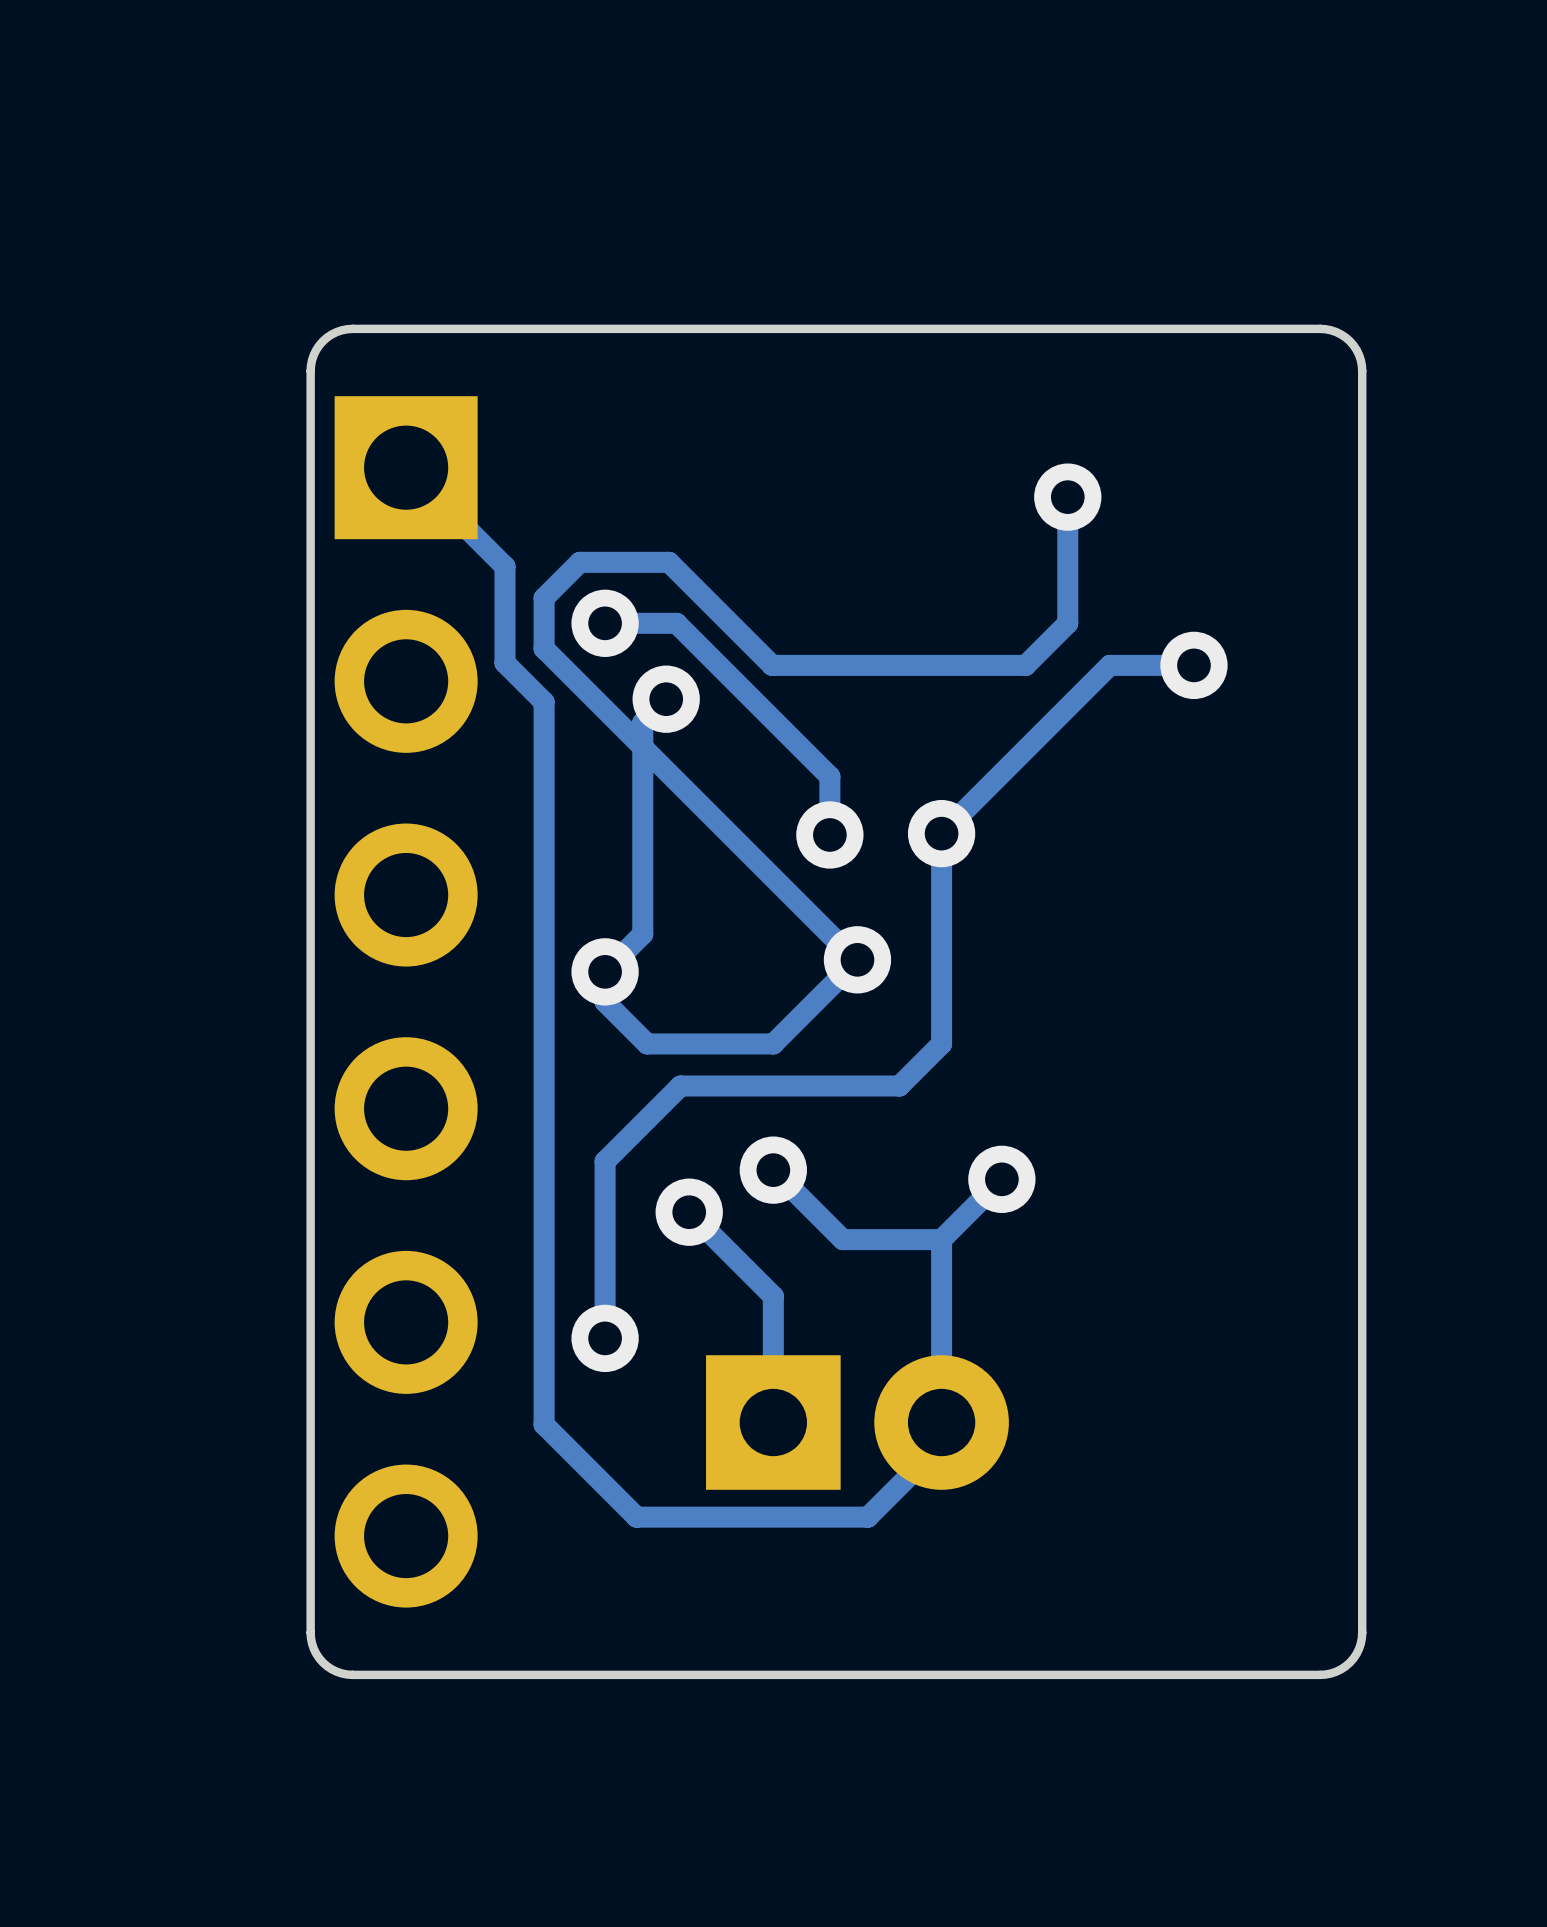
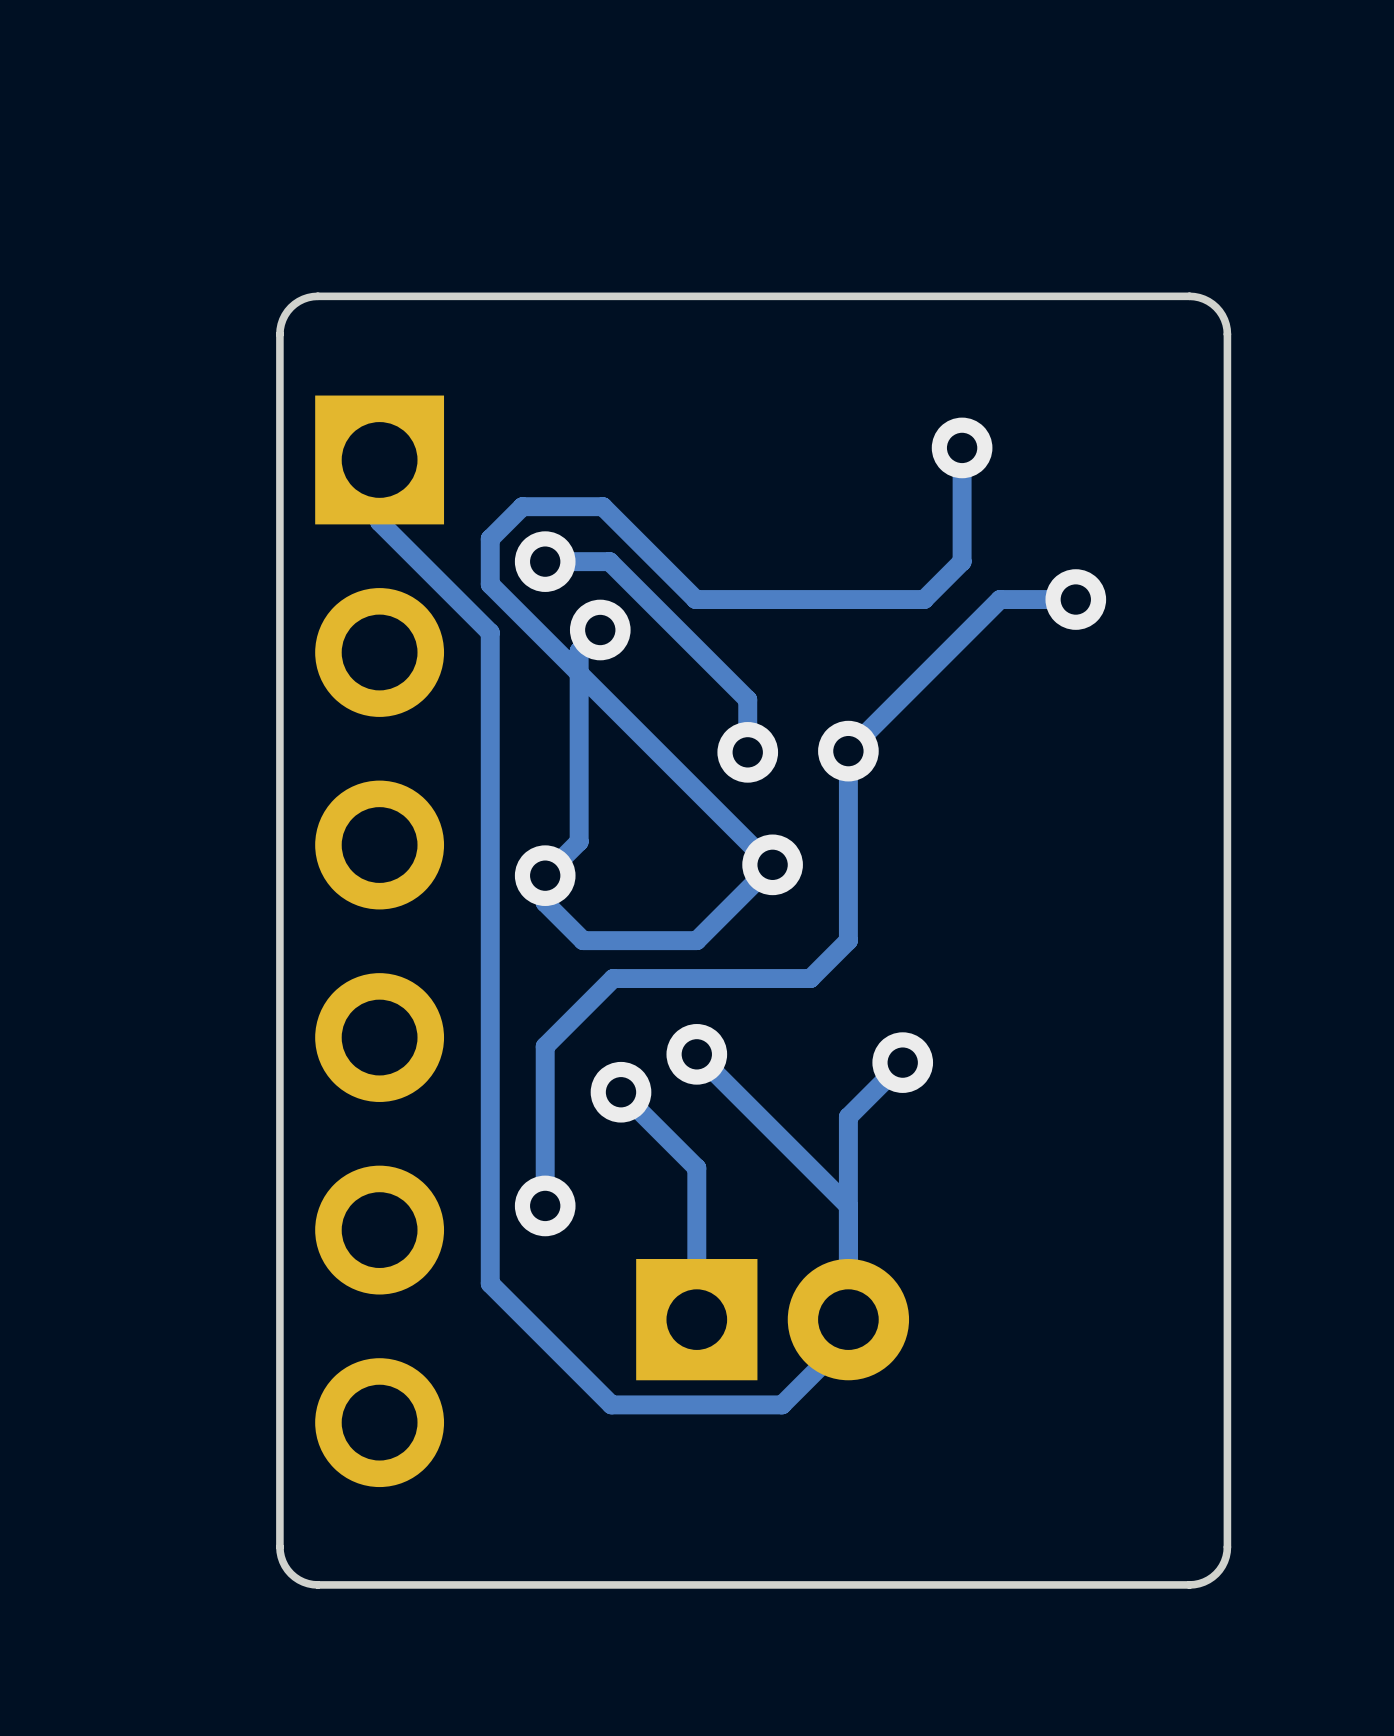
track: (406, 467) (504, 566) (504, 663) -> (379, 459) (379, 521) (455, 597)
part position: (406, 1001) -> (379, 941)
track: (941, 1239) (842, 1239) -> (848, 1205) (759, 1116)
part position: (857, 1422) -> (772, 1319)
track: (941, 1443) (867, 1517) (636, 1517) -> (848, 1338) (782, 1404) (611, 1404) (573, 1367)
board edge: (1362, 1632) (1359, 1648) (1349, 1662) (1336, 1671) (1320, 1674) (352, 1674) (336, 1671) (322, 1662) (313, 1648) (310, 1632) -> (1227, 1471) (1226, 1556) (1219, 1570) (1212, 1577) (1204, 1582) (1189, 1584) (312, 1584) (294, 1577) (287, 1570) (281, 1556) (279, 1471)

